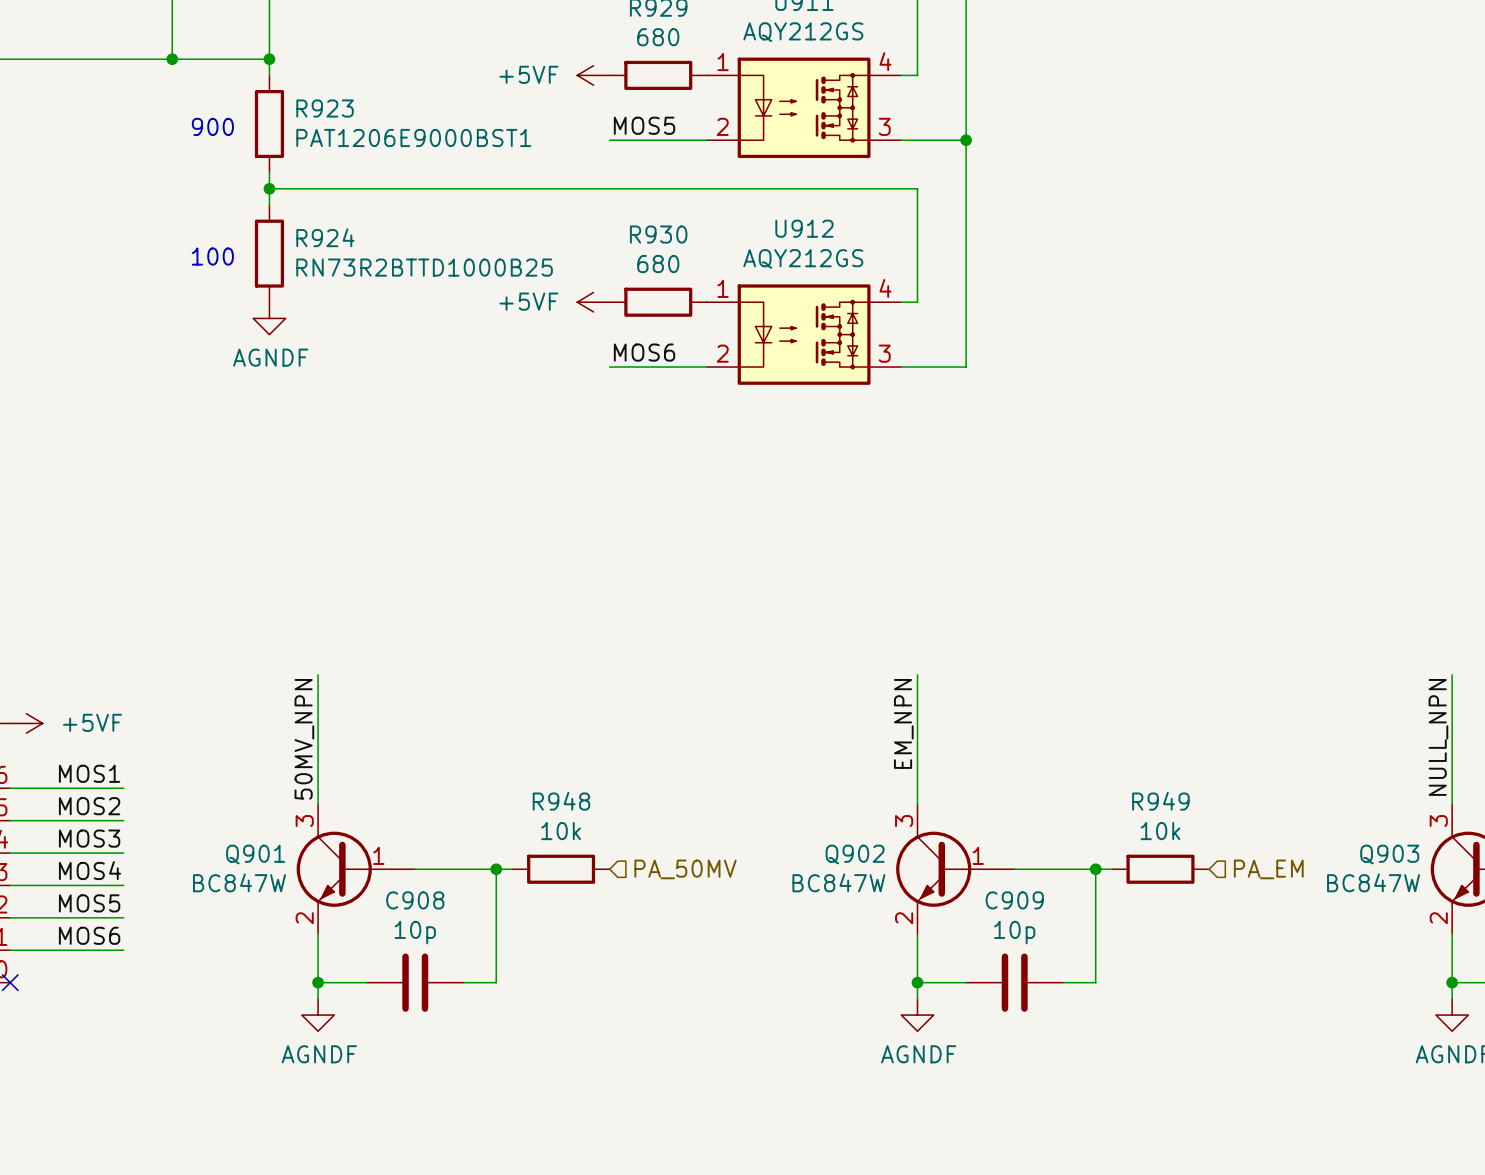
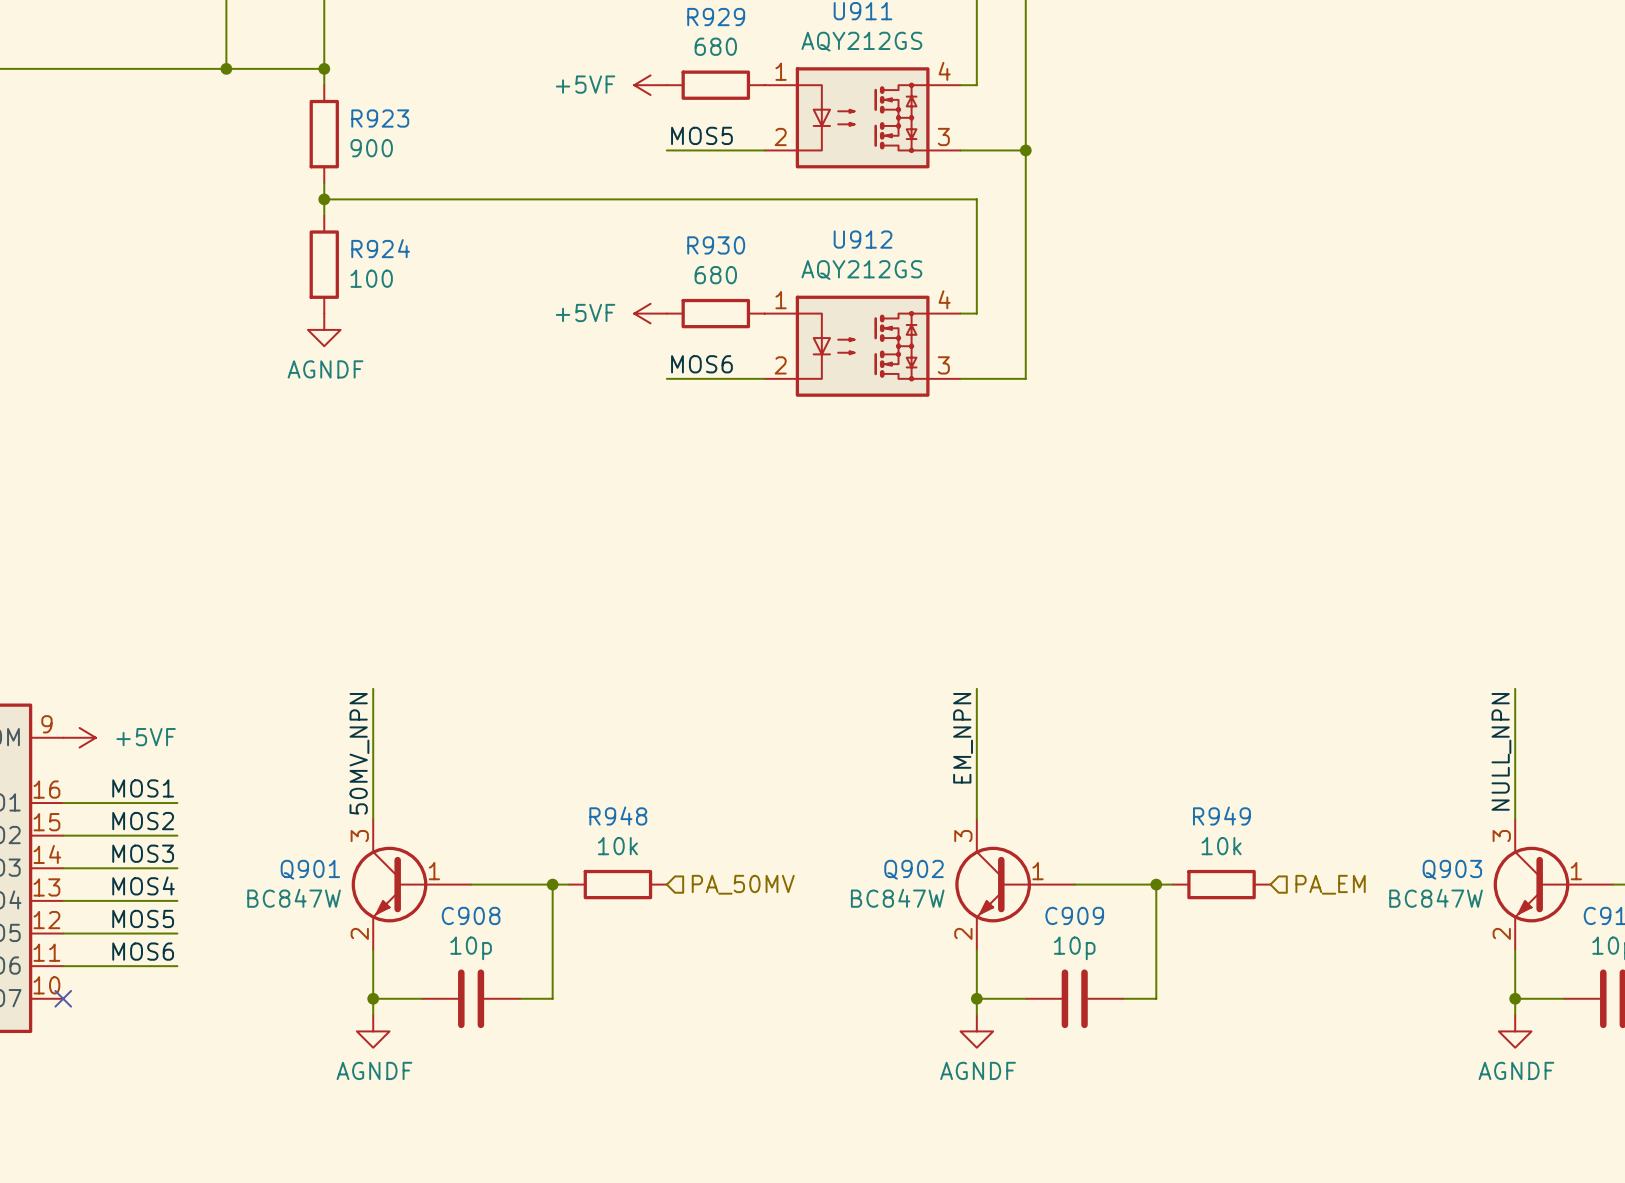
text: 900 (212, 126) -> none
R923 value: PAT1206E9000BST1 (413, 137) -> 900 (371, 148)
text: 100 (212, 256) -> none
R924 value: RN73R2BTTD1000B25 (424, 267) -> 100 (371, 278)

